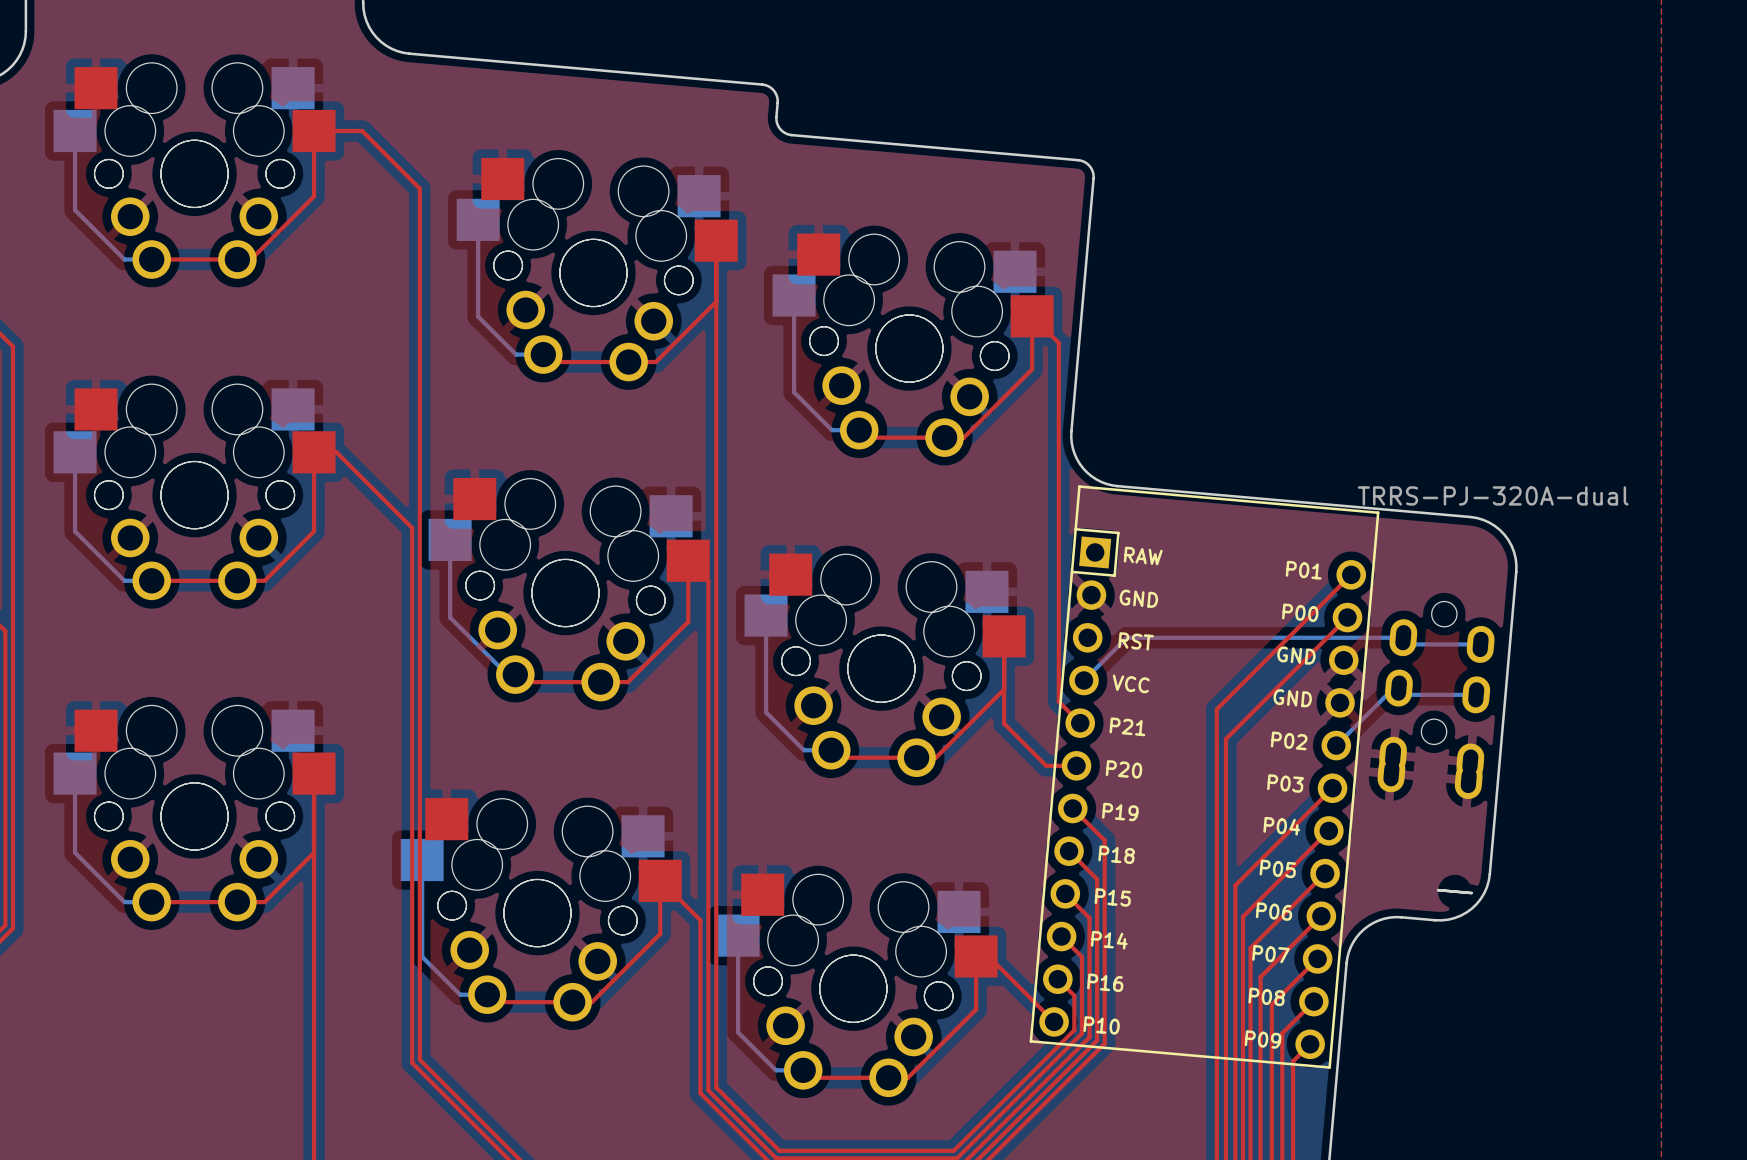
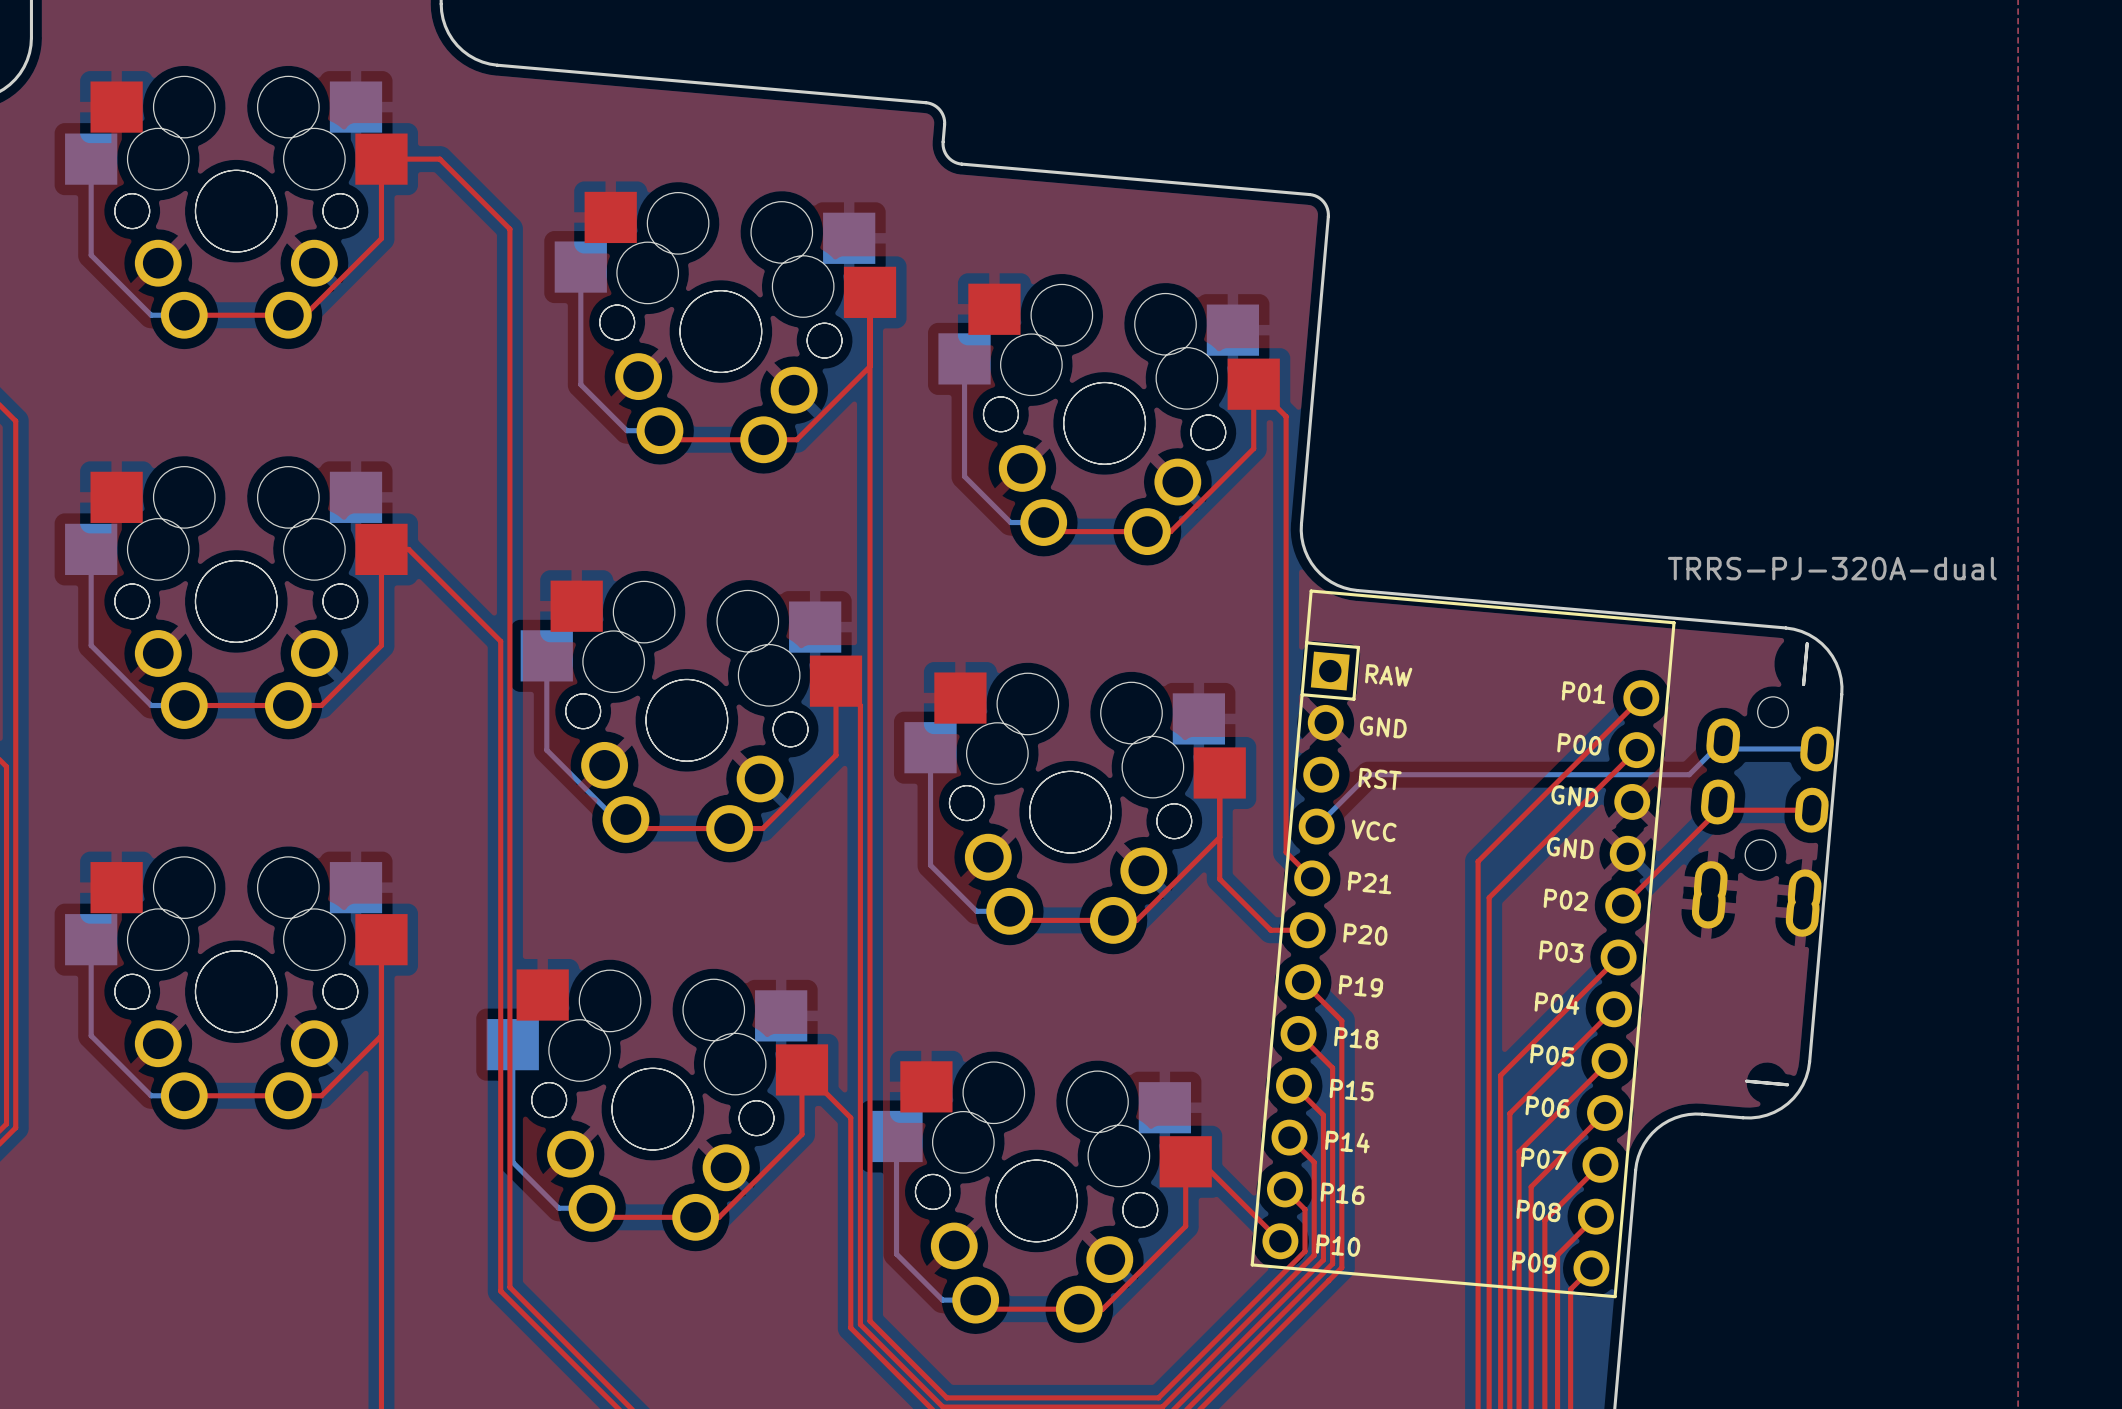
board edge: none -> (1807, 643) (1803, 684) (1807, 643)
bottom track: none -> (1817, 748) (1731, 748) (1723, 740) (1689, 774)
bottom track: (1403, 637) (1410, 644) (1480, 644) -> none
top track: none -> (1811, 810) (1726, 810) (1717, 801) (1717, 810) (1623, 905)
bottom track: (1476, 694) (1405, 694) (1398, 688) (1393, 688) (1336, 745) -> none
part position: (1436, 700) -> (1762, 816)

